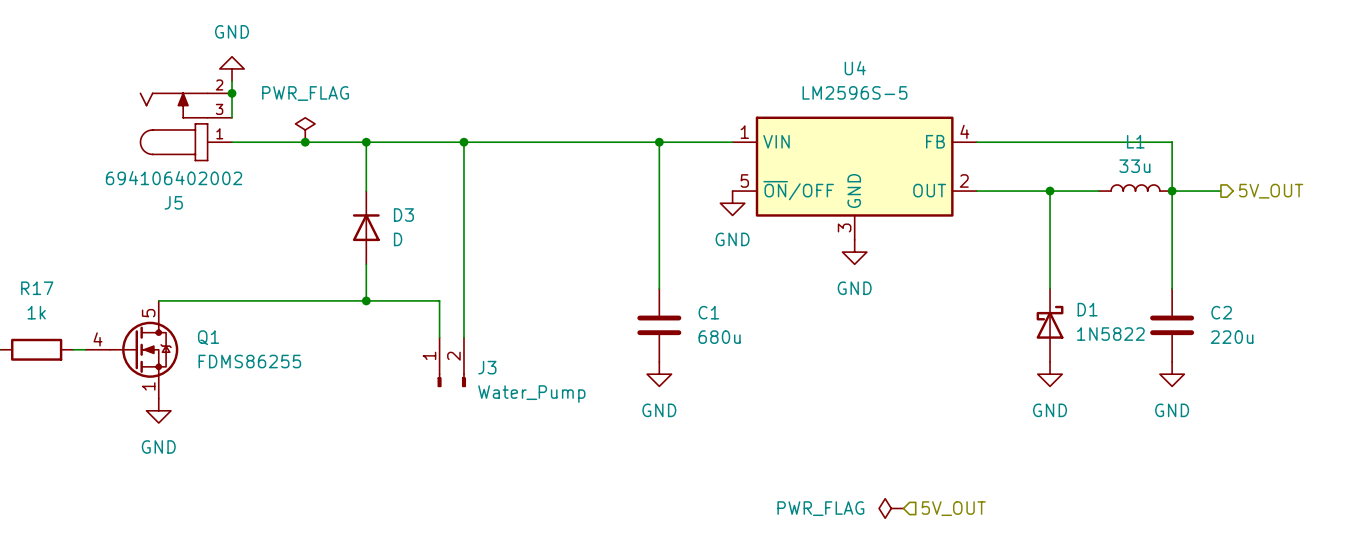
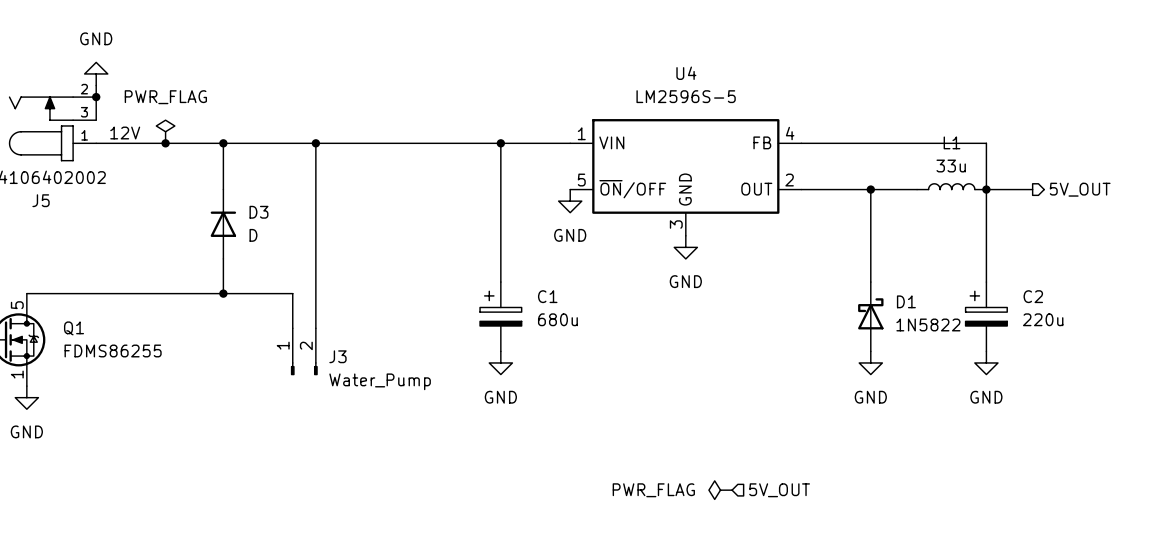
label: none -> 12V (125, 133)
C1 symbol: [637, 288, 682, 362] -> [480, 282, 522, 352]
C2 symbol: [1150, 288, 1195, 362] -> [965, 282, 1008, 352]

